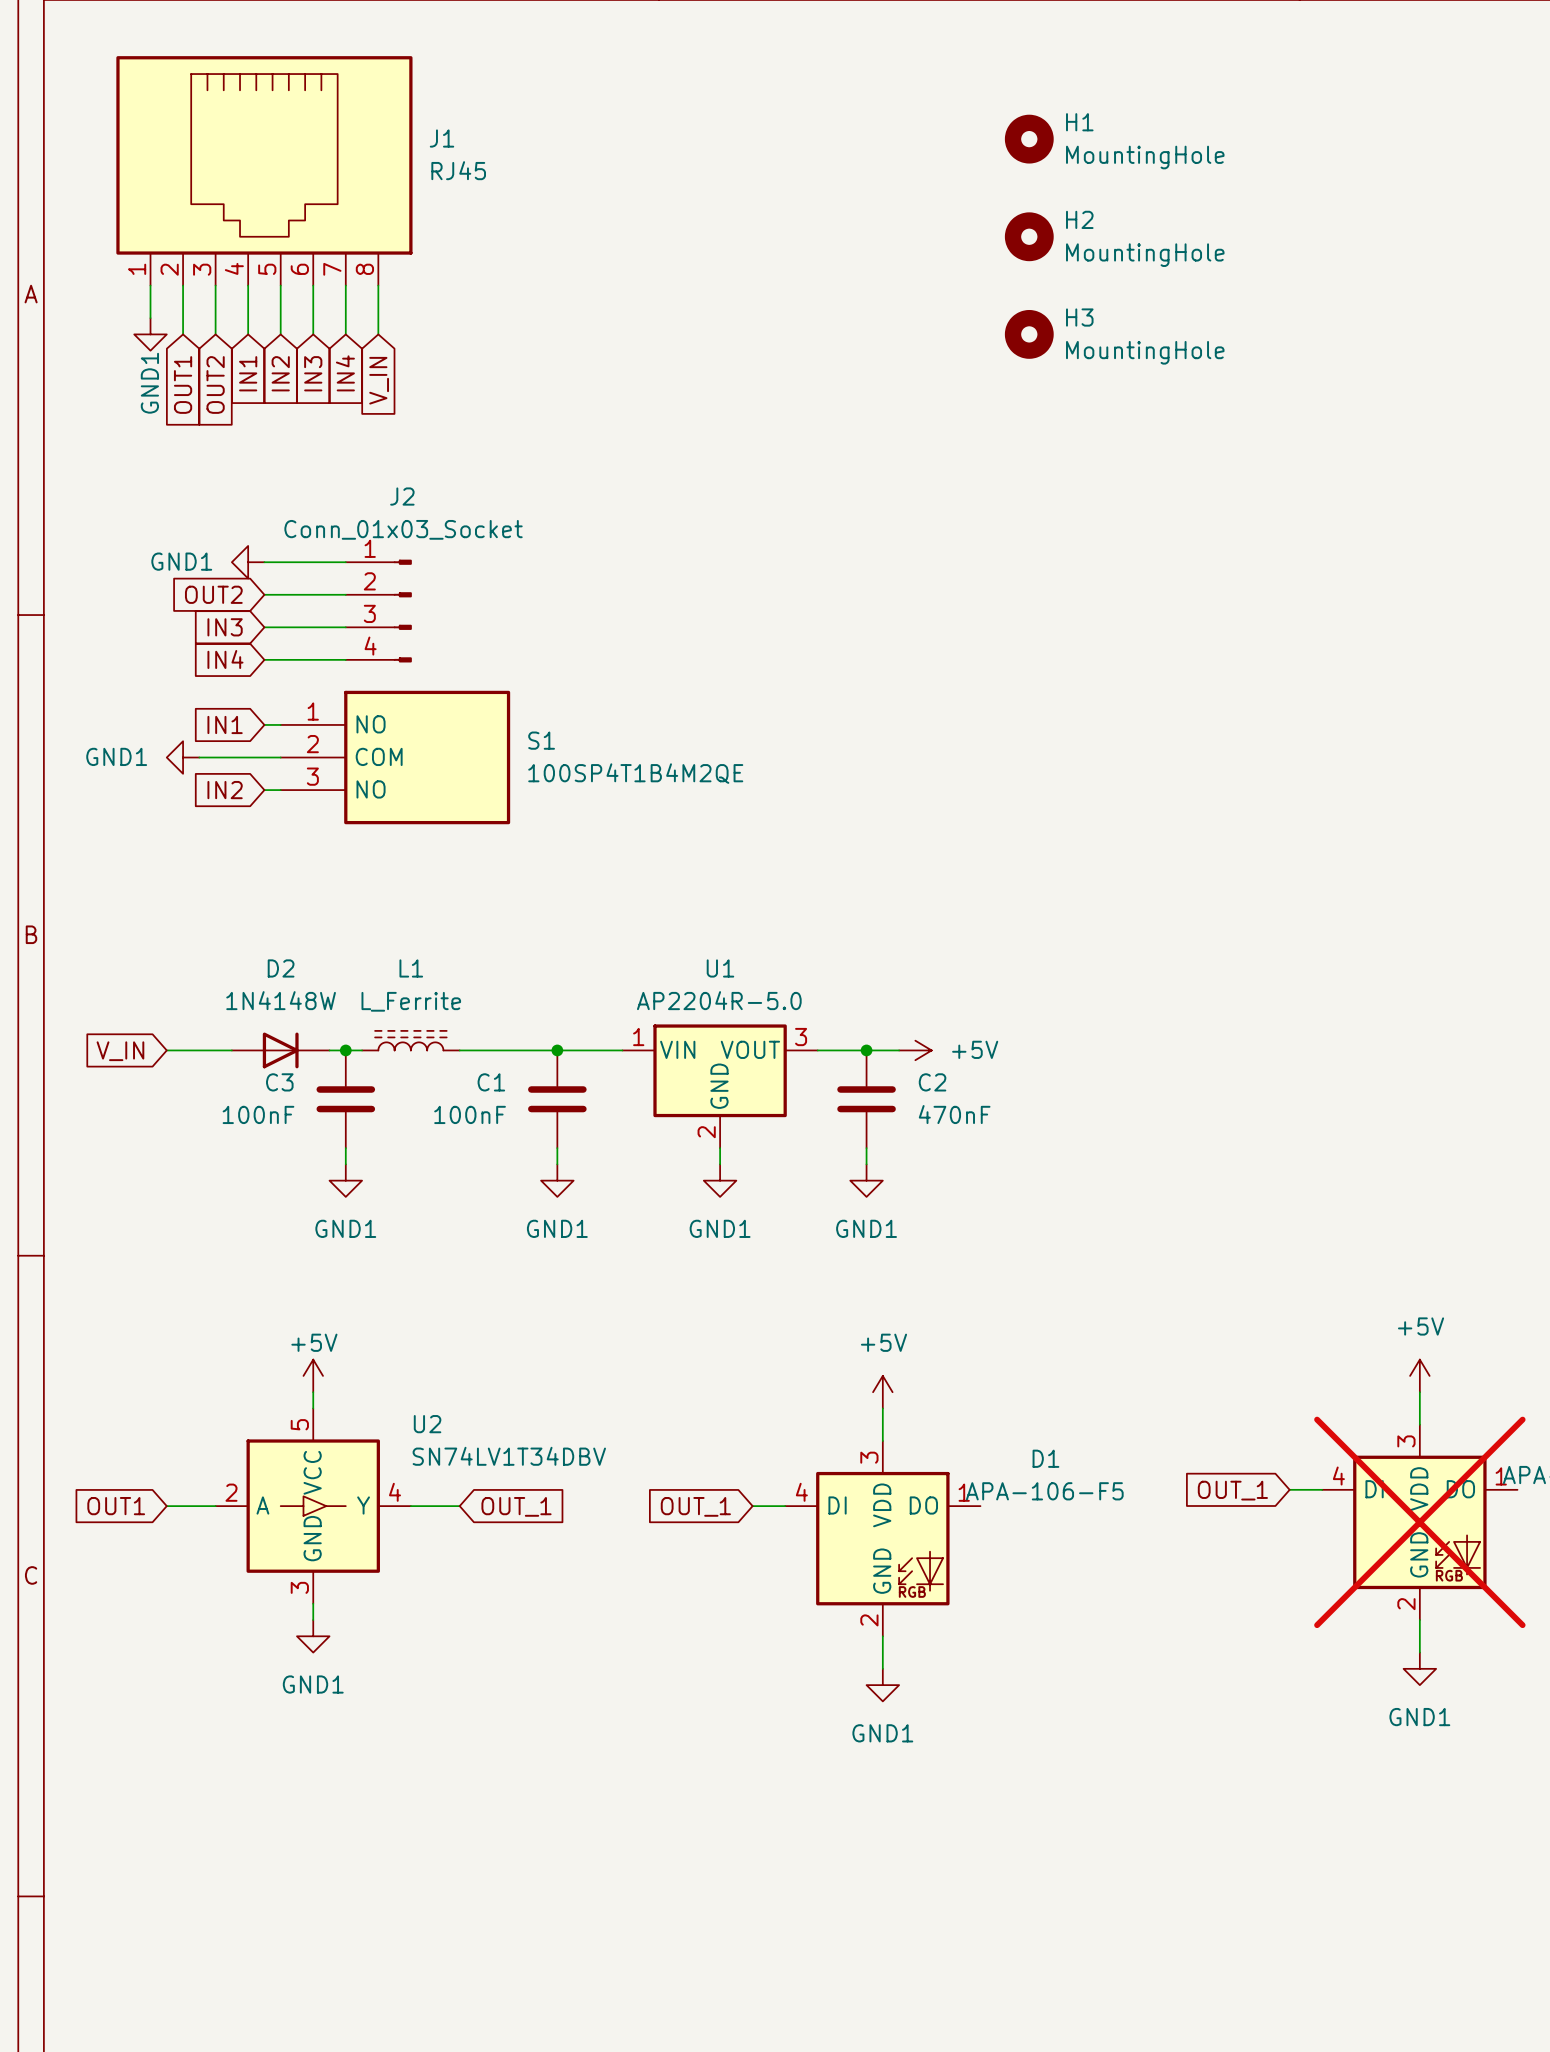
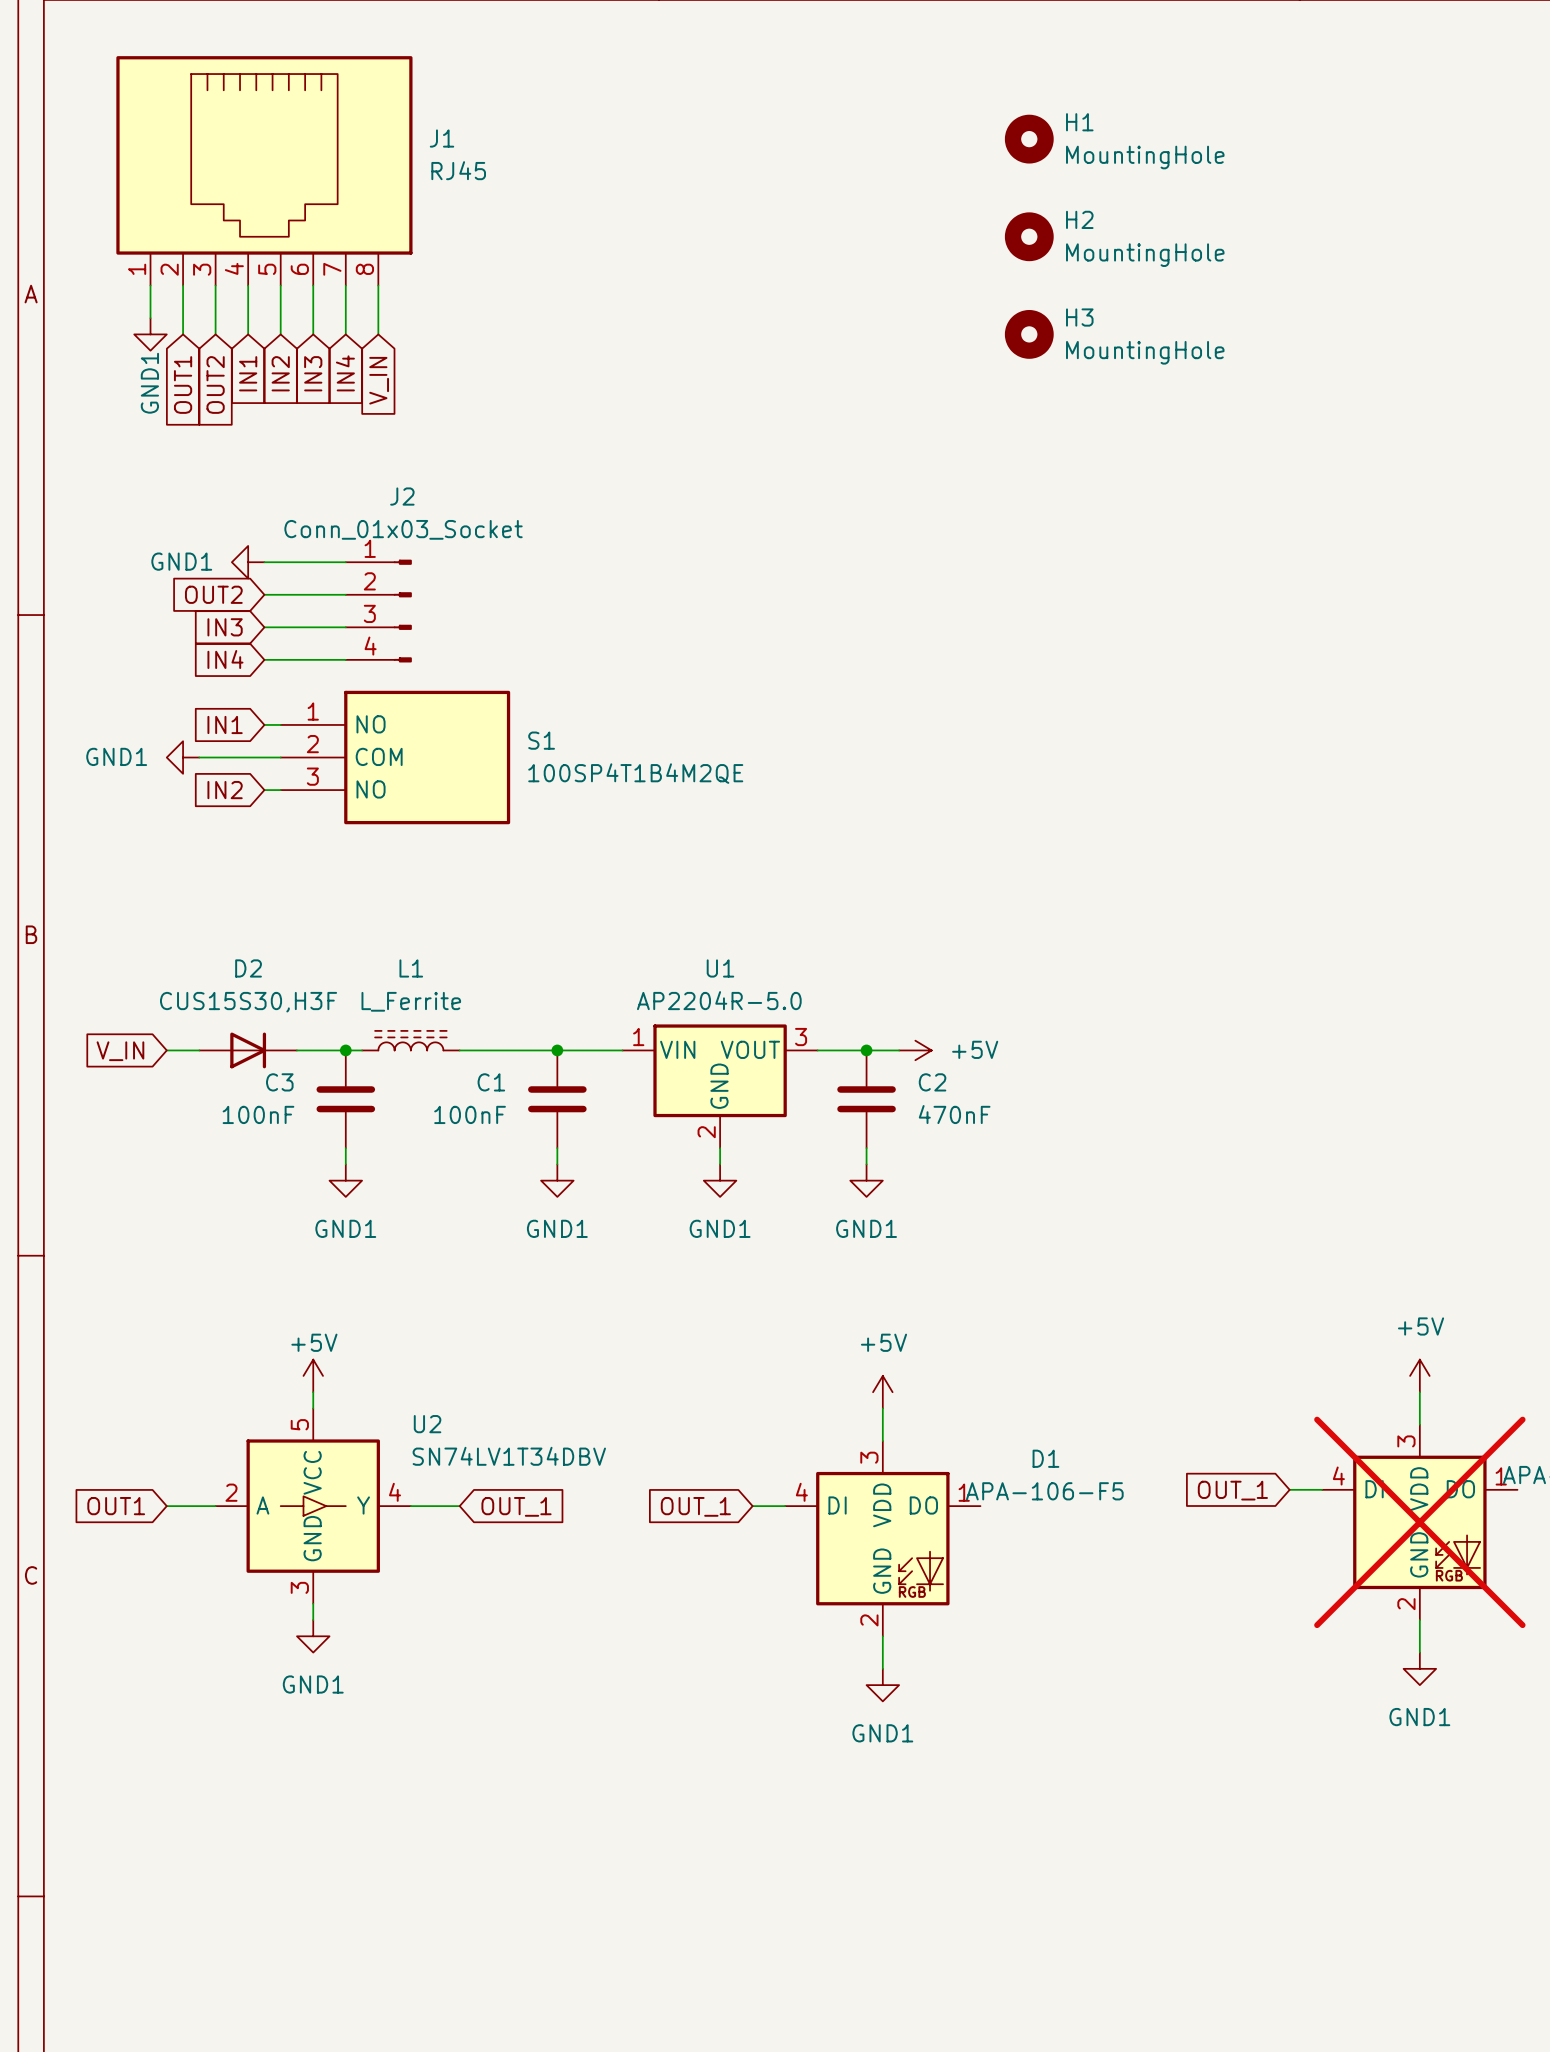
D2 value: 1N4148W (281, 1000) -> CUS15S30,H3F (248, 1002)
D2 position: (280, 1050) -> (248, 1050)

